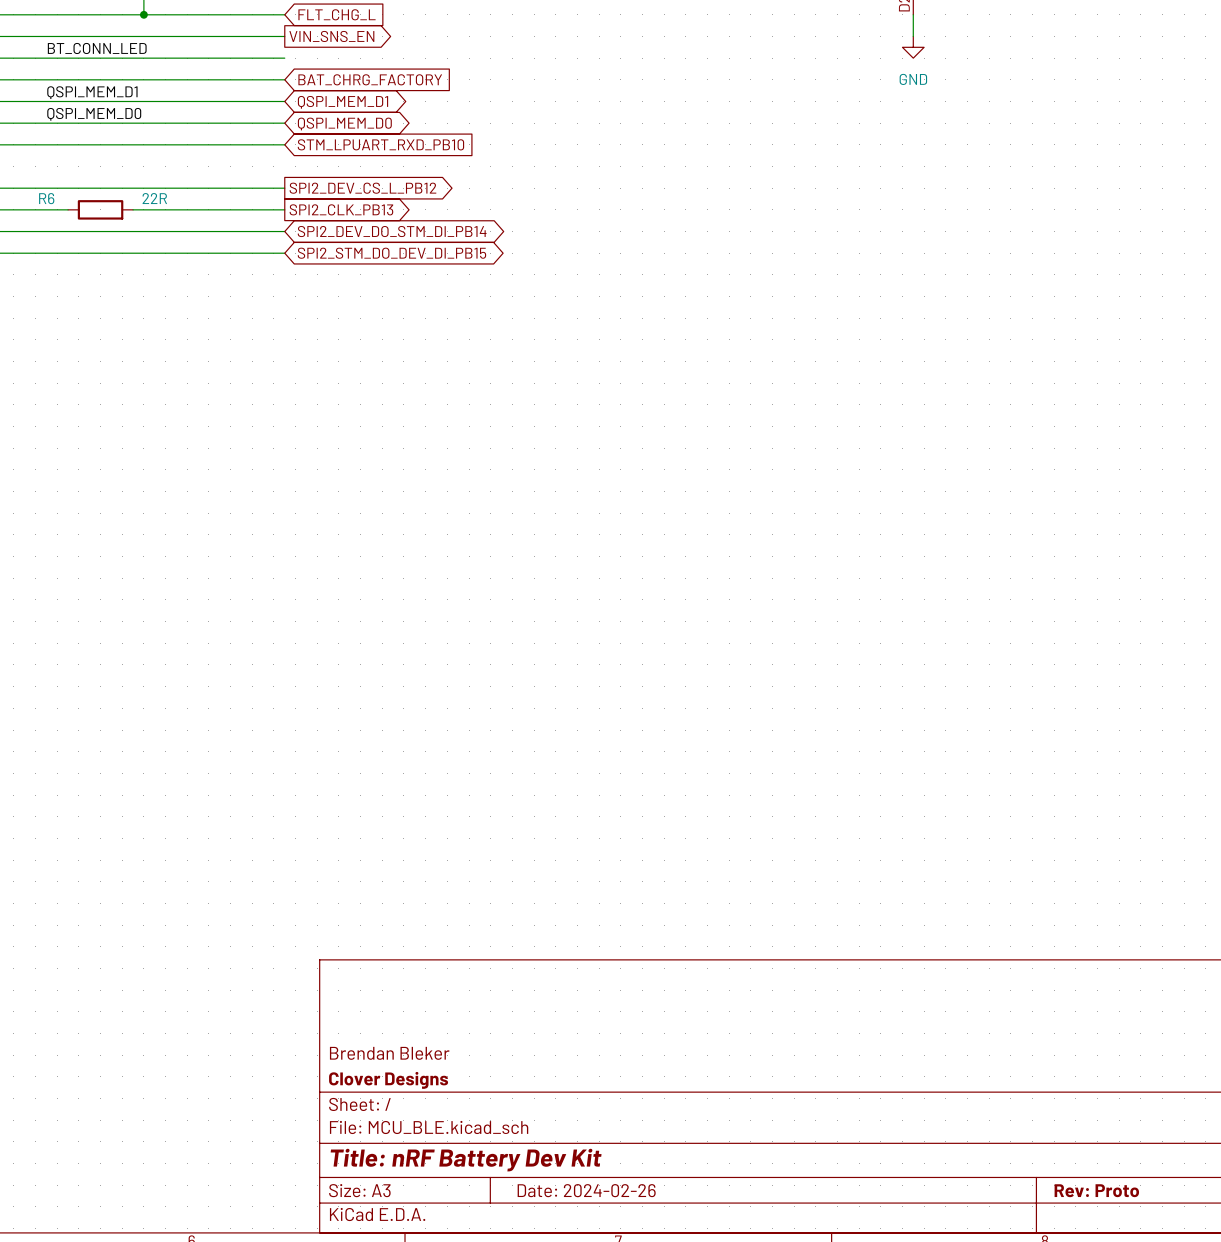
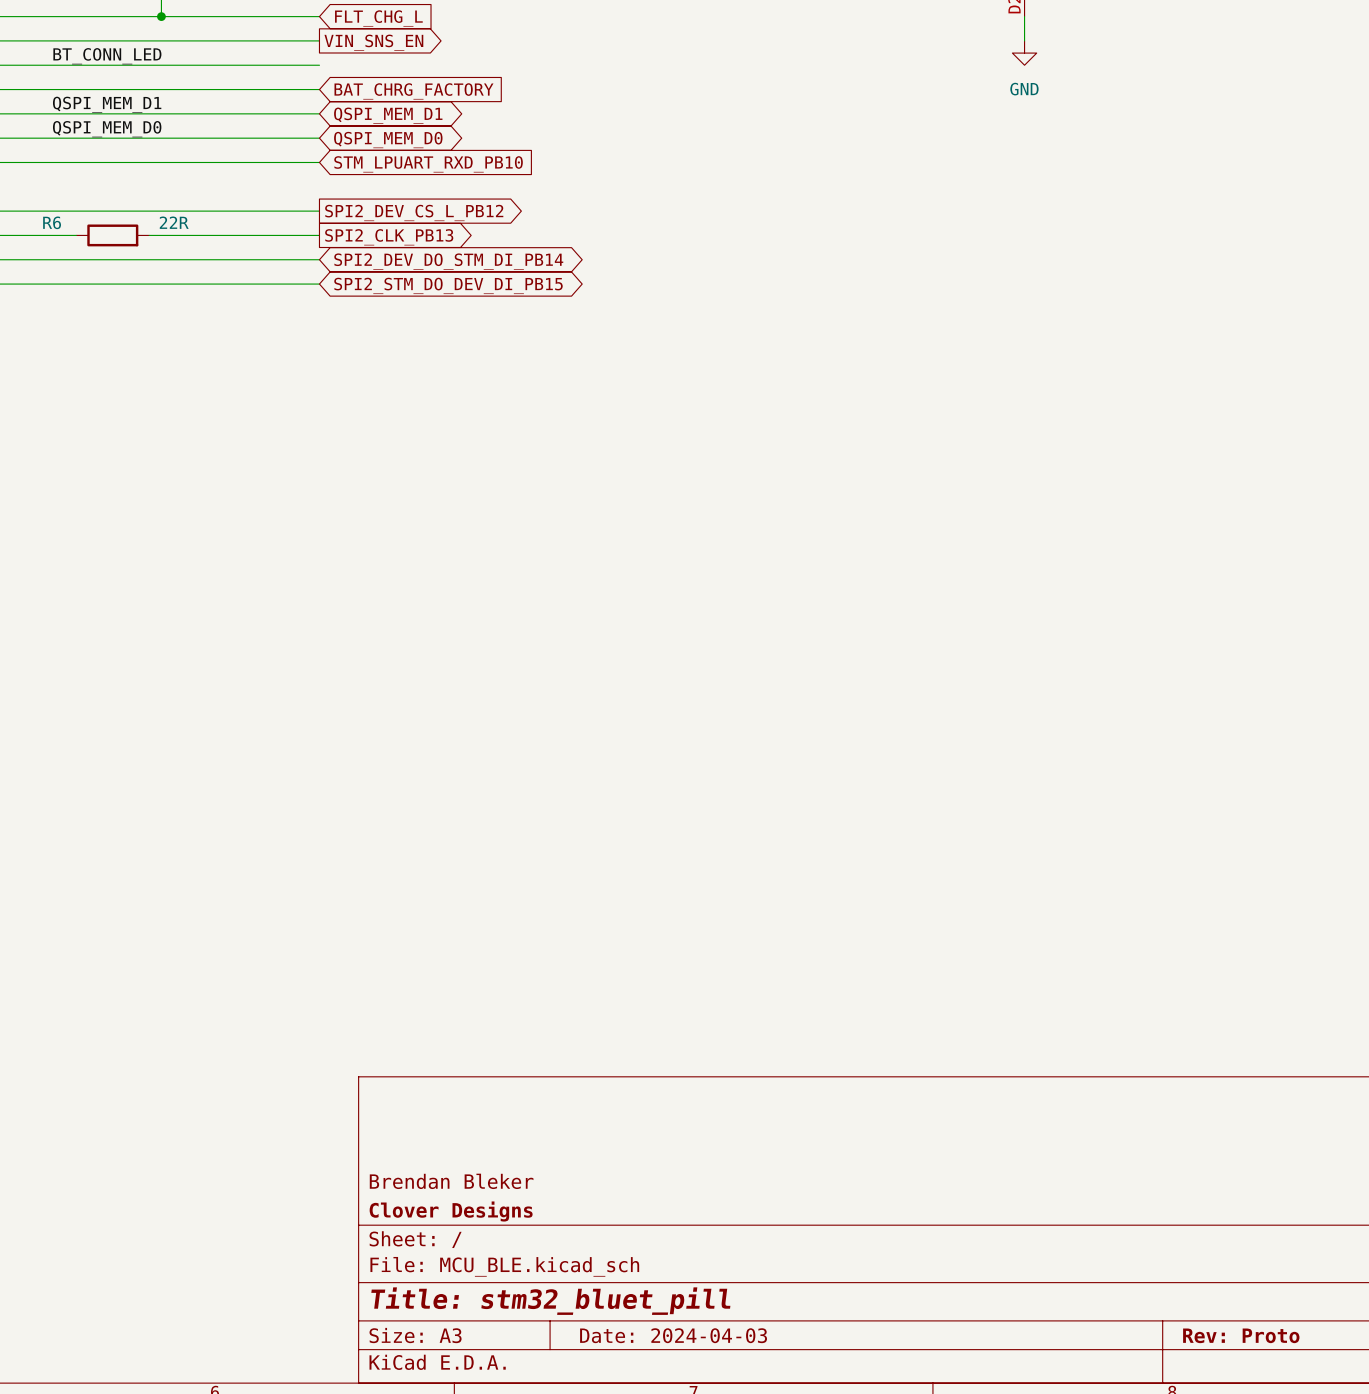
title block: Title: nRF Battery Dev Kit (466, 1160) -> Title: stm32_bluet_pill (550, 1301)
title block: Date: 2024-02-26 (586, 1190) -> Date: 2024-04-03 (673, 1335)

